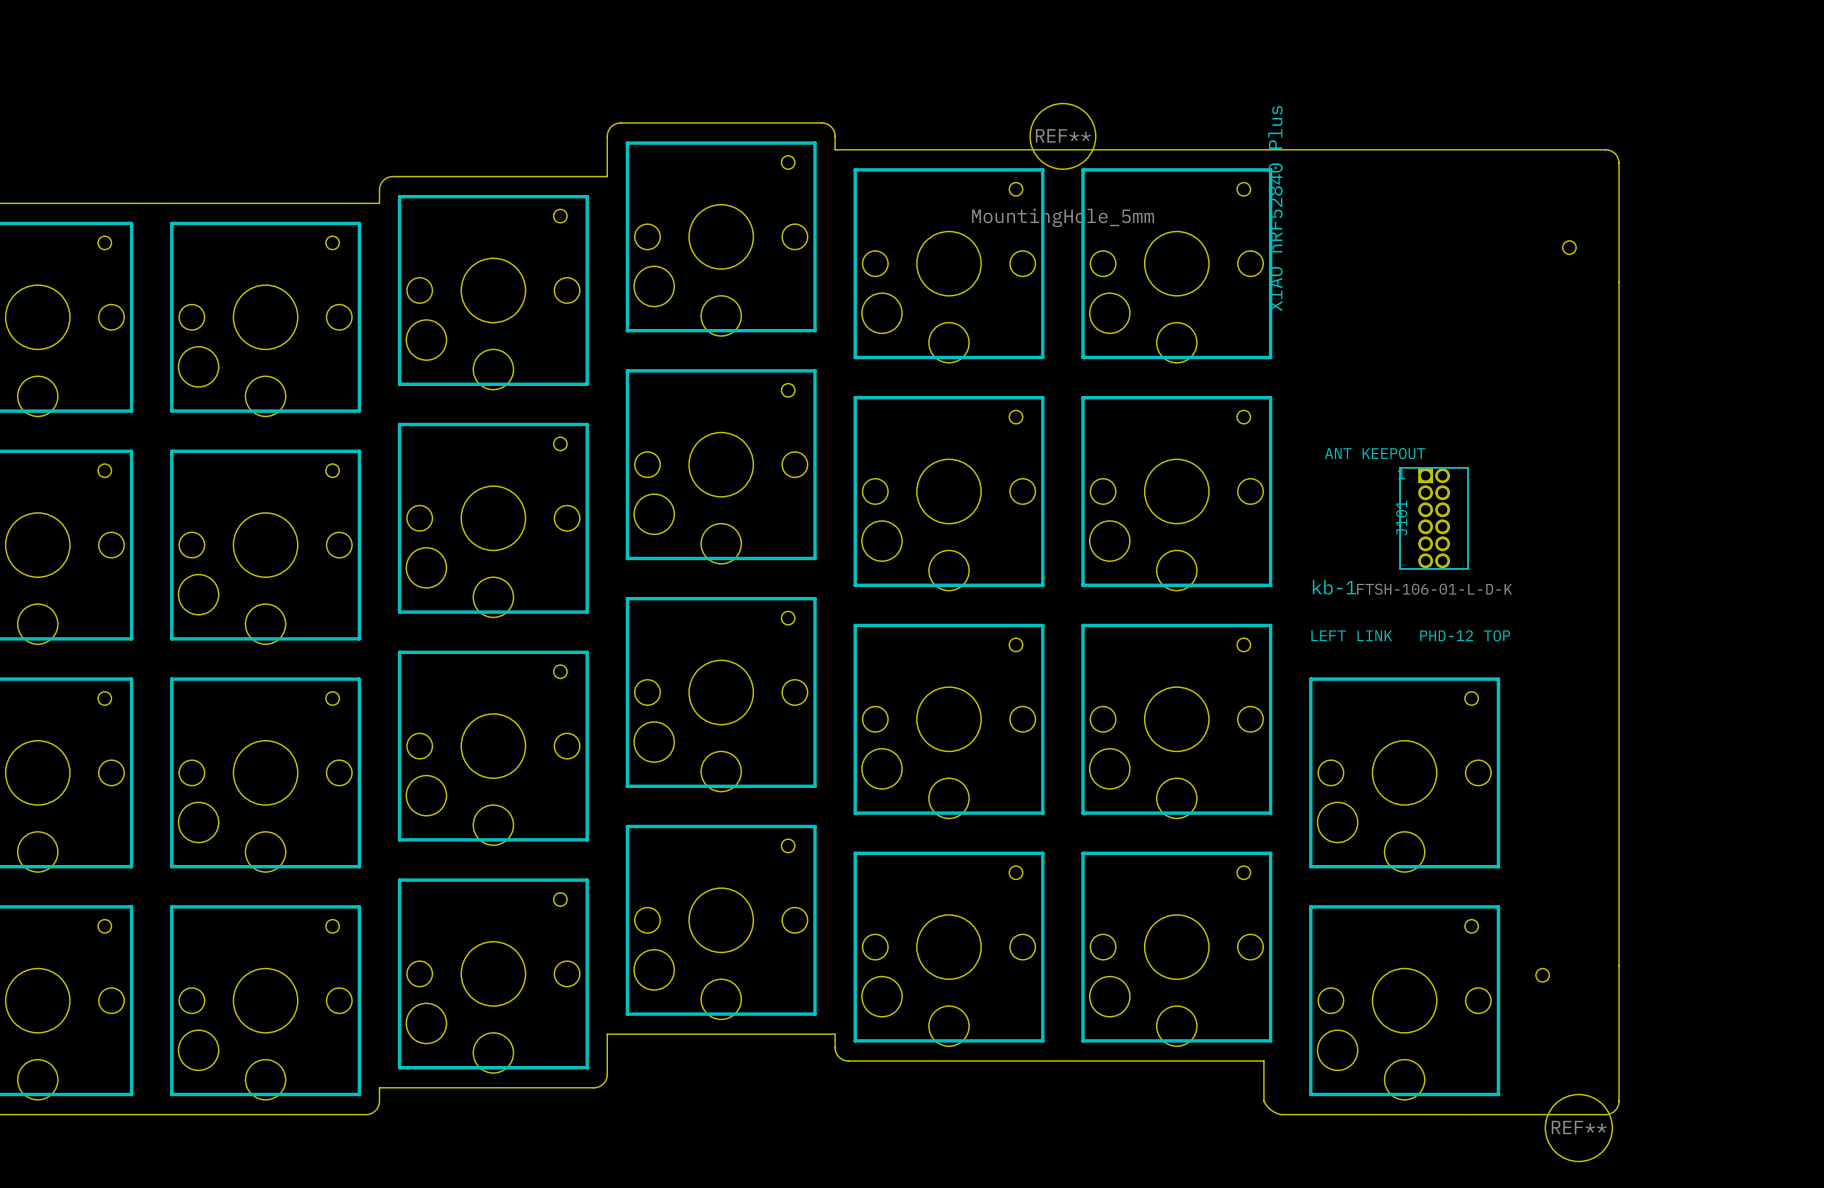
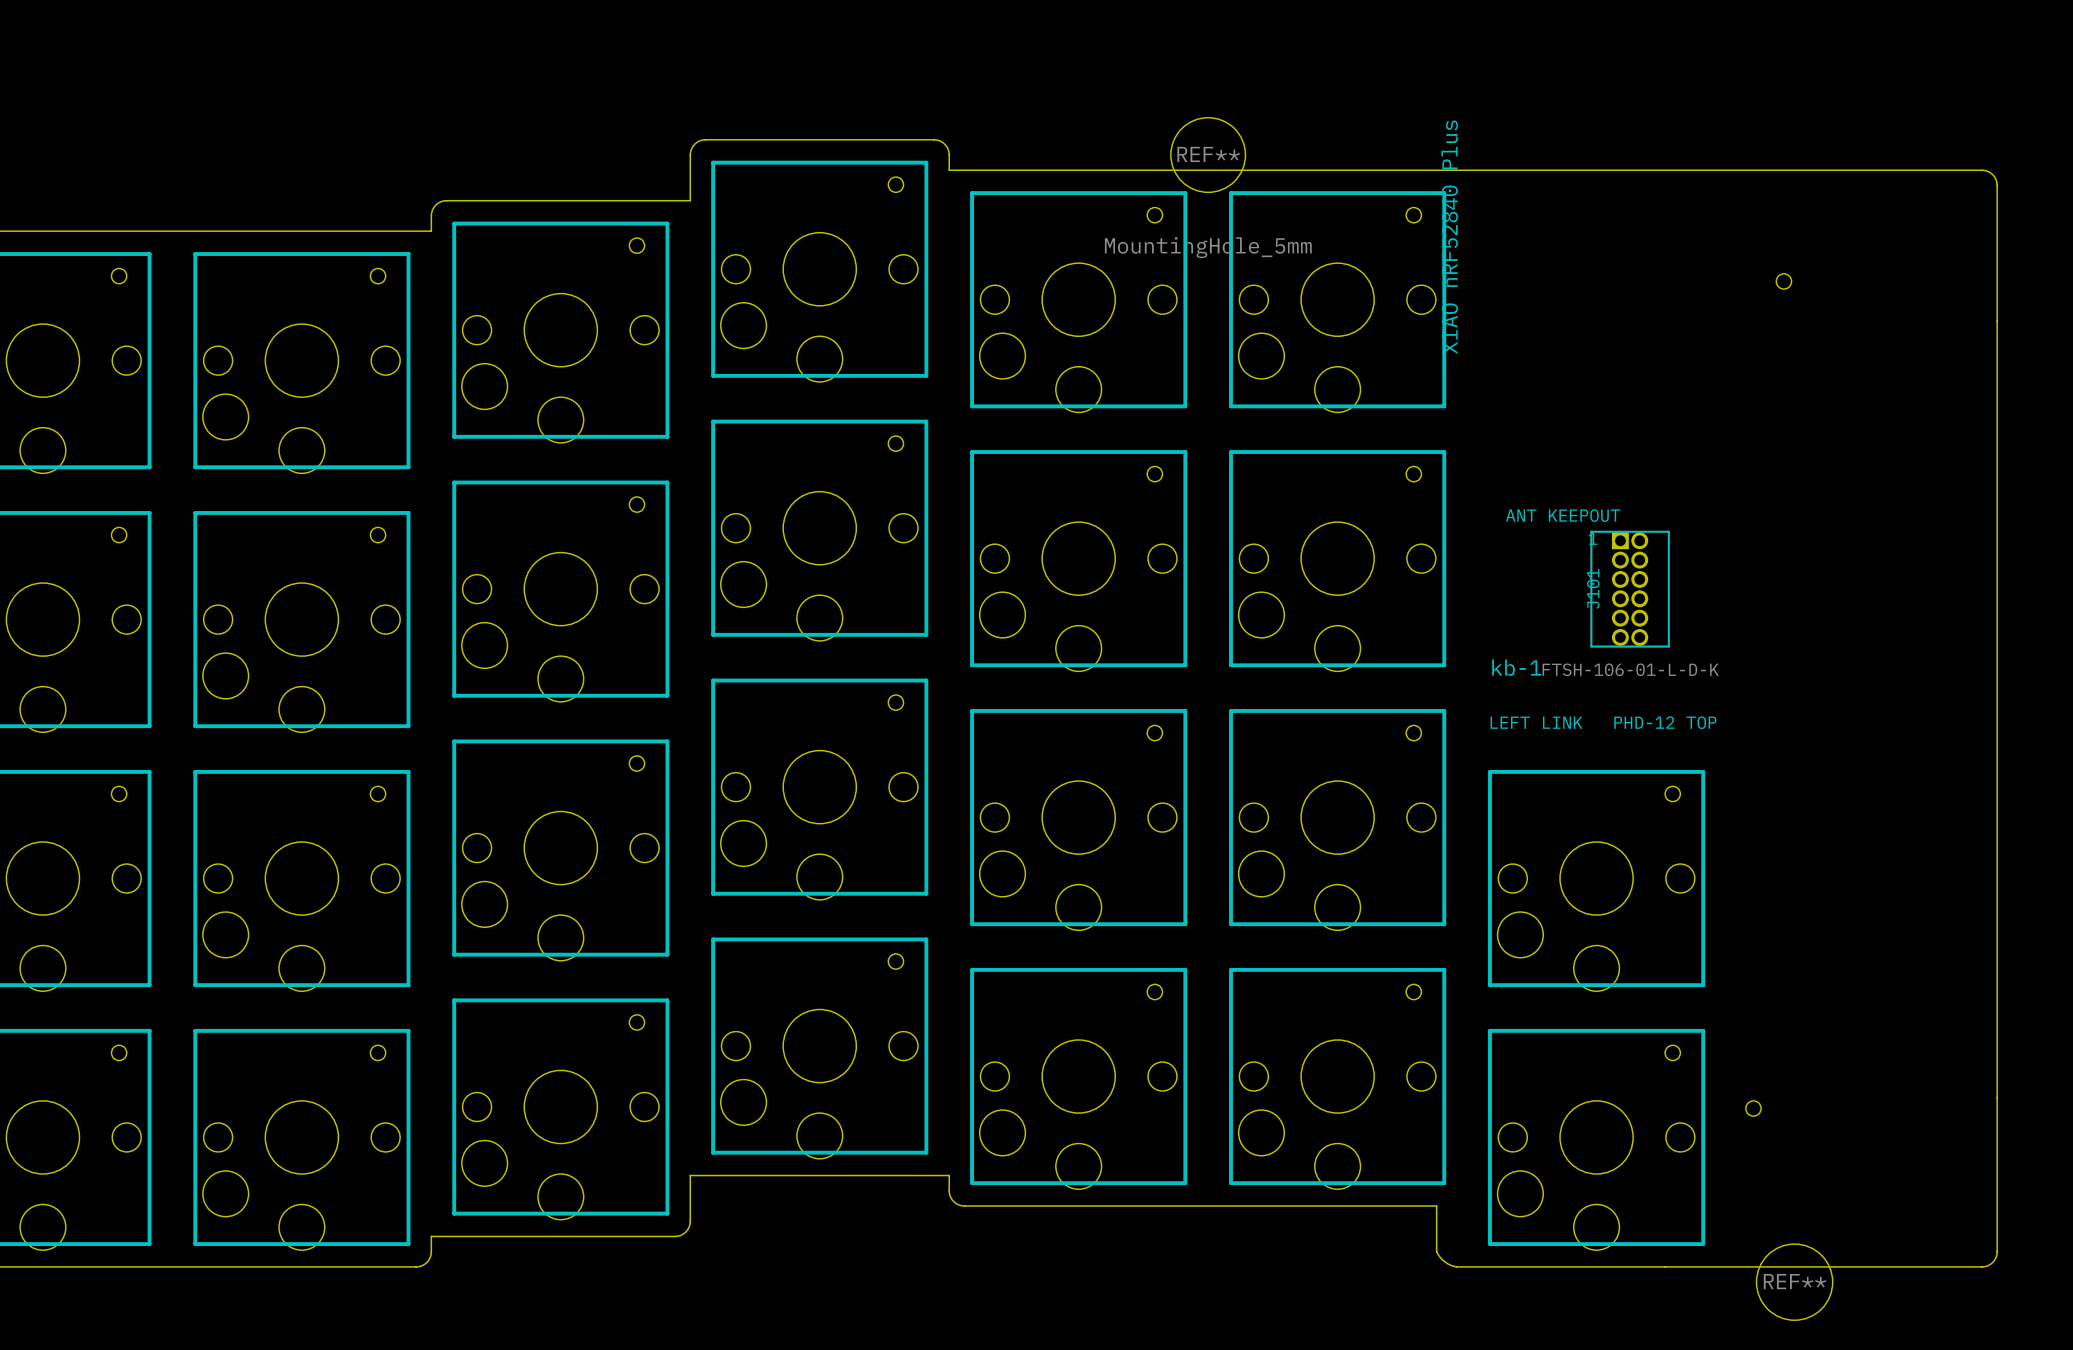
board edge: (1605, 149) (1615, 153) (1619, 163) (1619, 1101) (1615, 1110) (1605, 1114) -> (1825, 170) (1983, 170) (1993, 175) (1997, 185) (1997, 1253) (1992, 1262) (1983, 1266) (1825, 1266)

